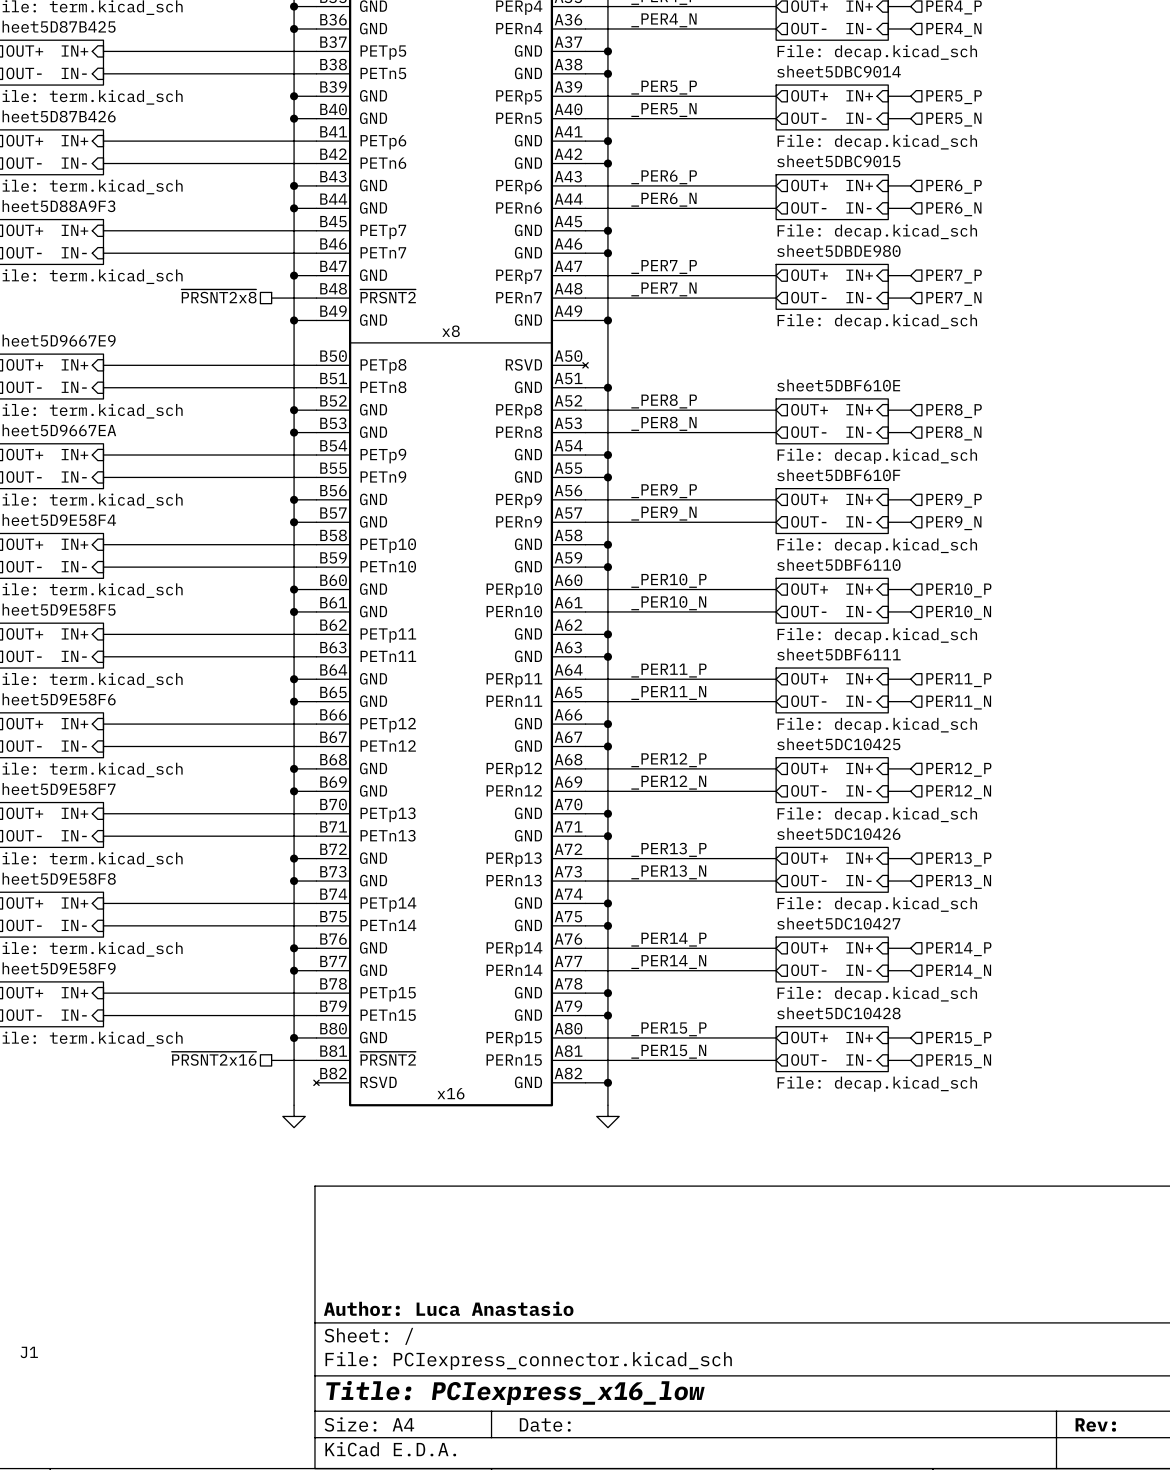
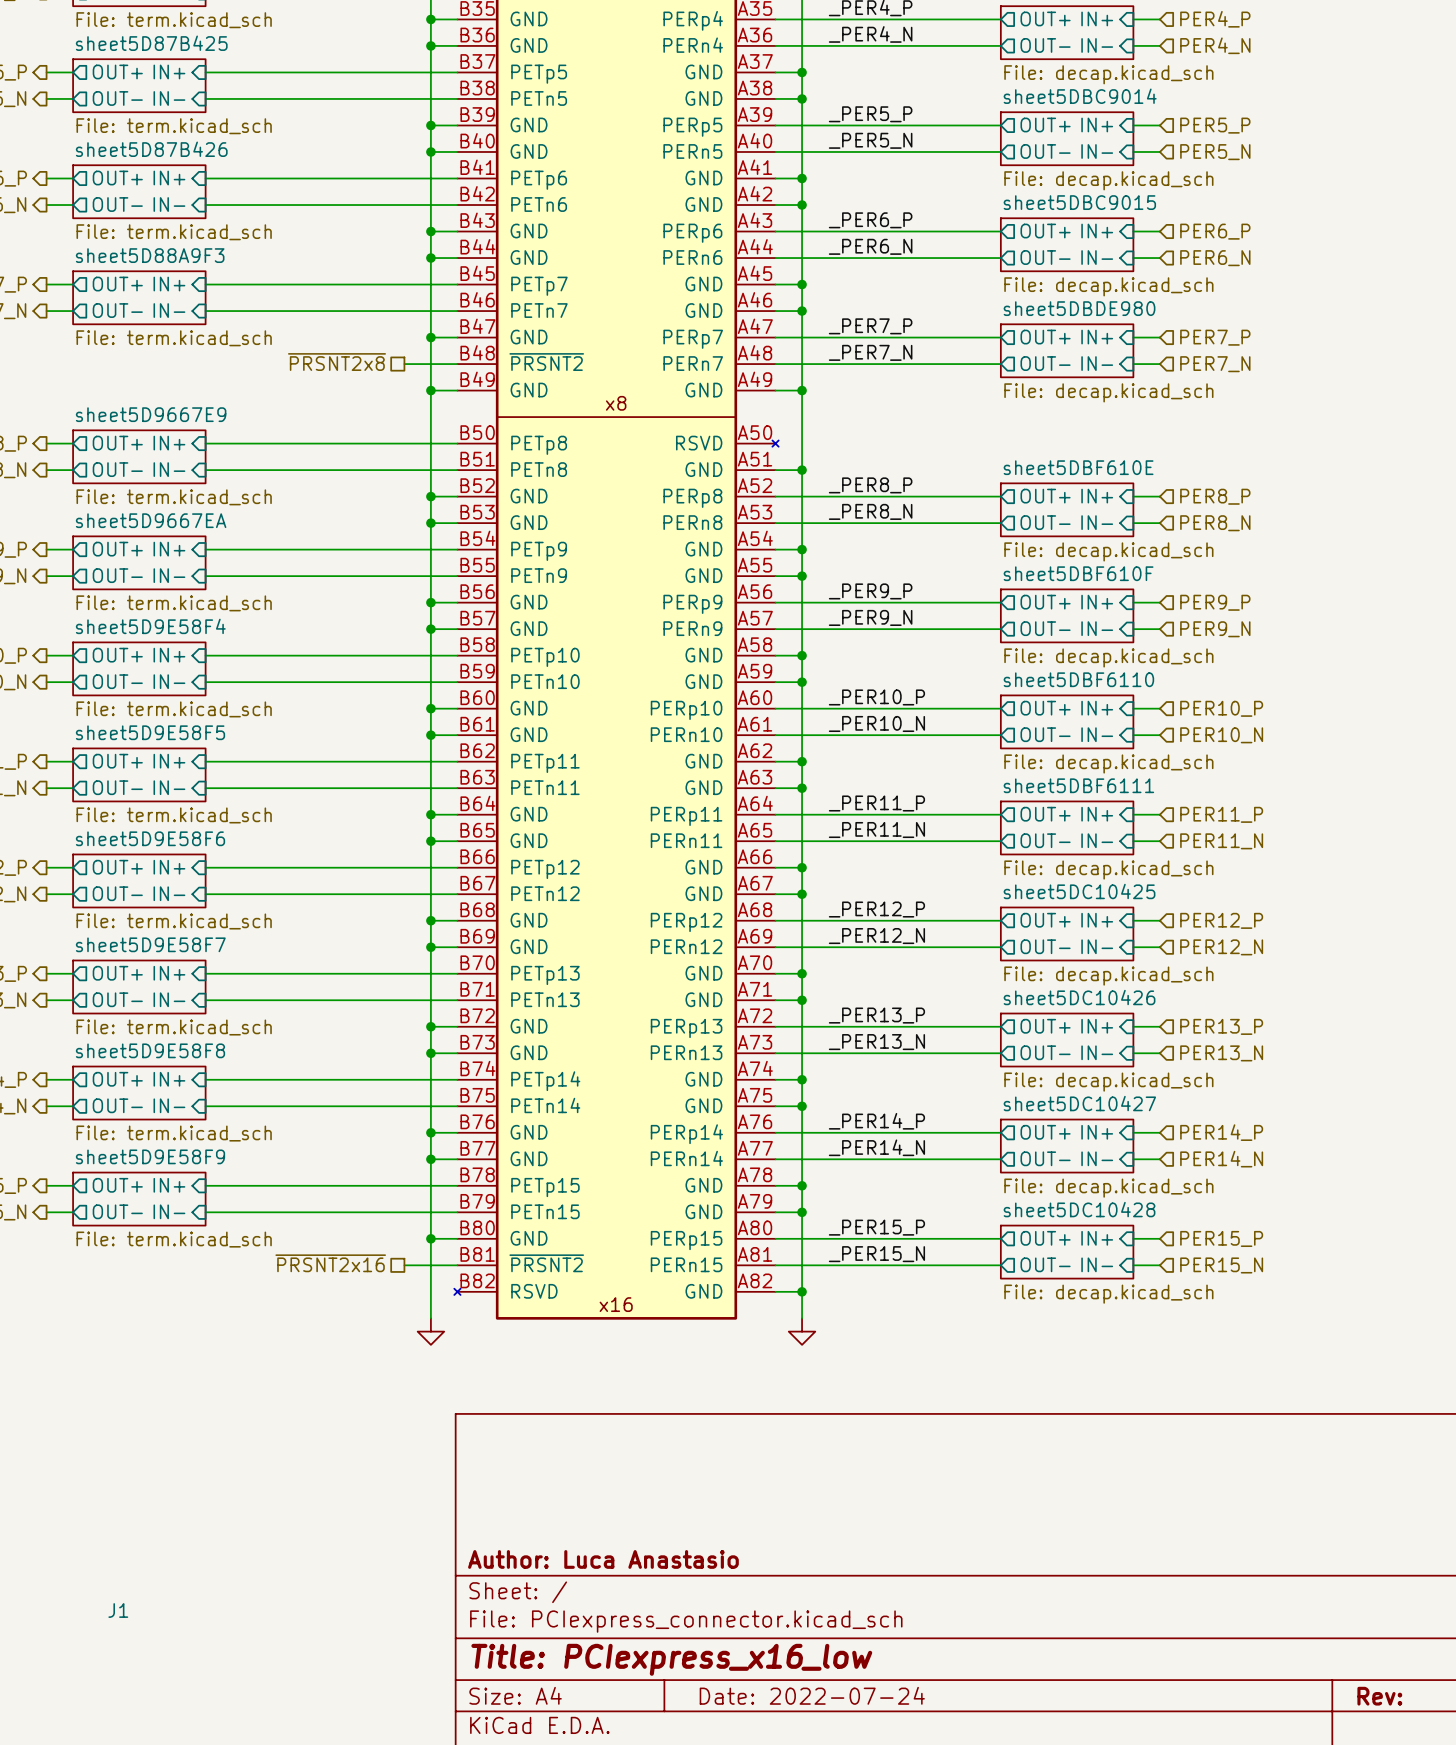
title block: Date: (545, 1424) -> Date: 2022-07-24 (812, 1695)

